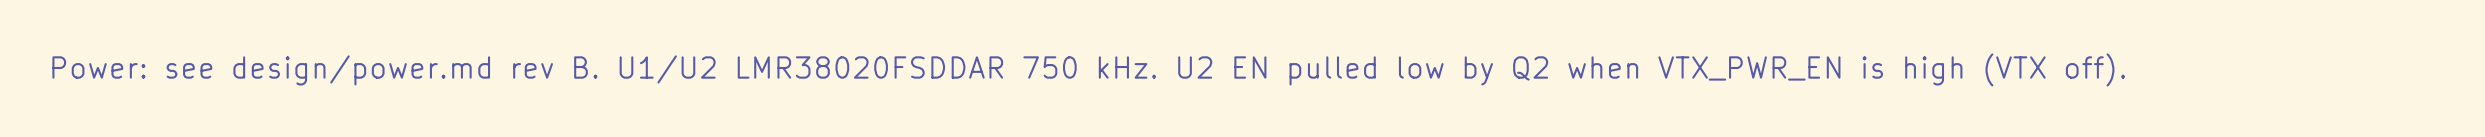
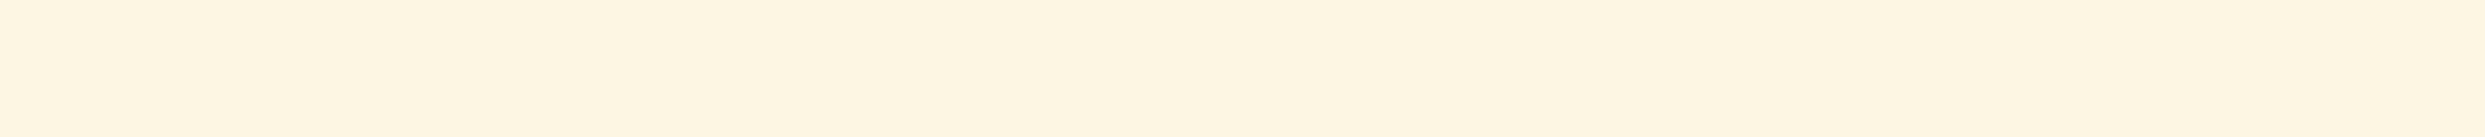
text: Power: see design/power.md rev B. U1/U2 LMR38020FSDDAR 750 kHz. U2 EN pulled low by Q2 when VTX_PWR_EN is high (VTX off). (1088, 69) -> none

